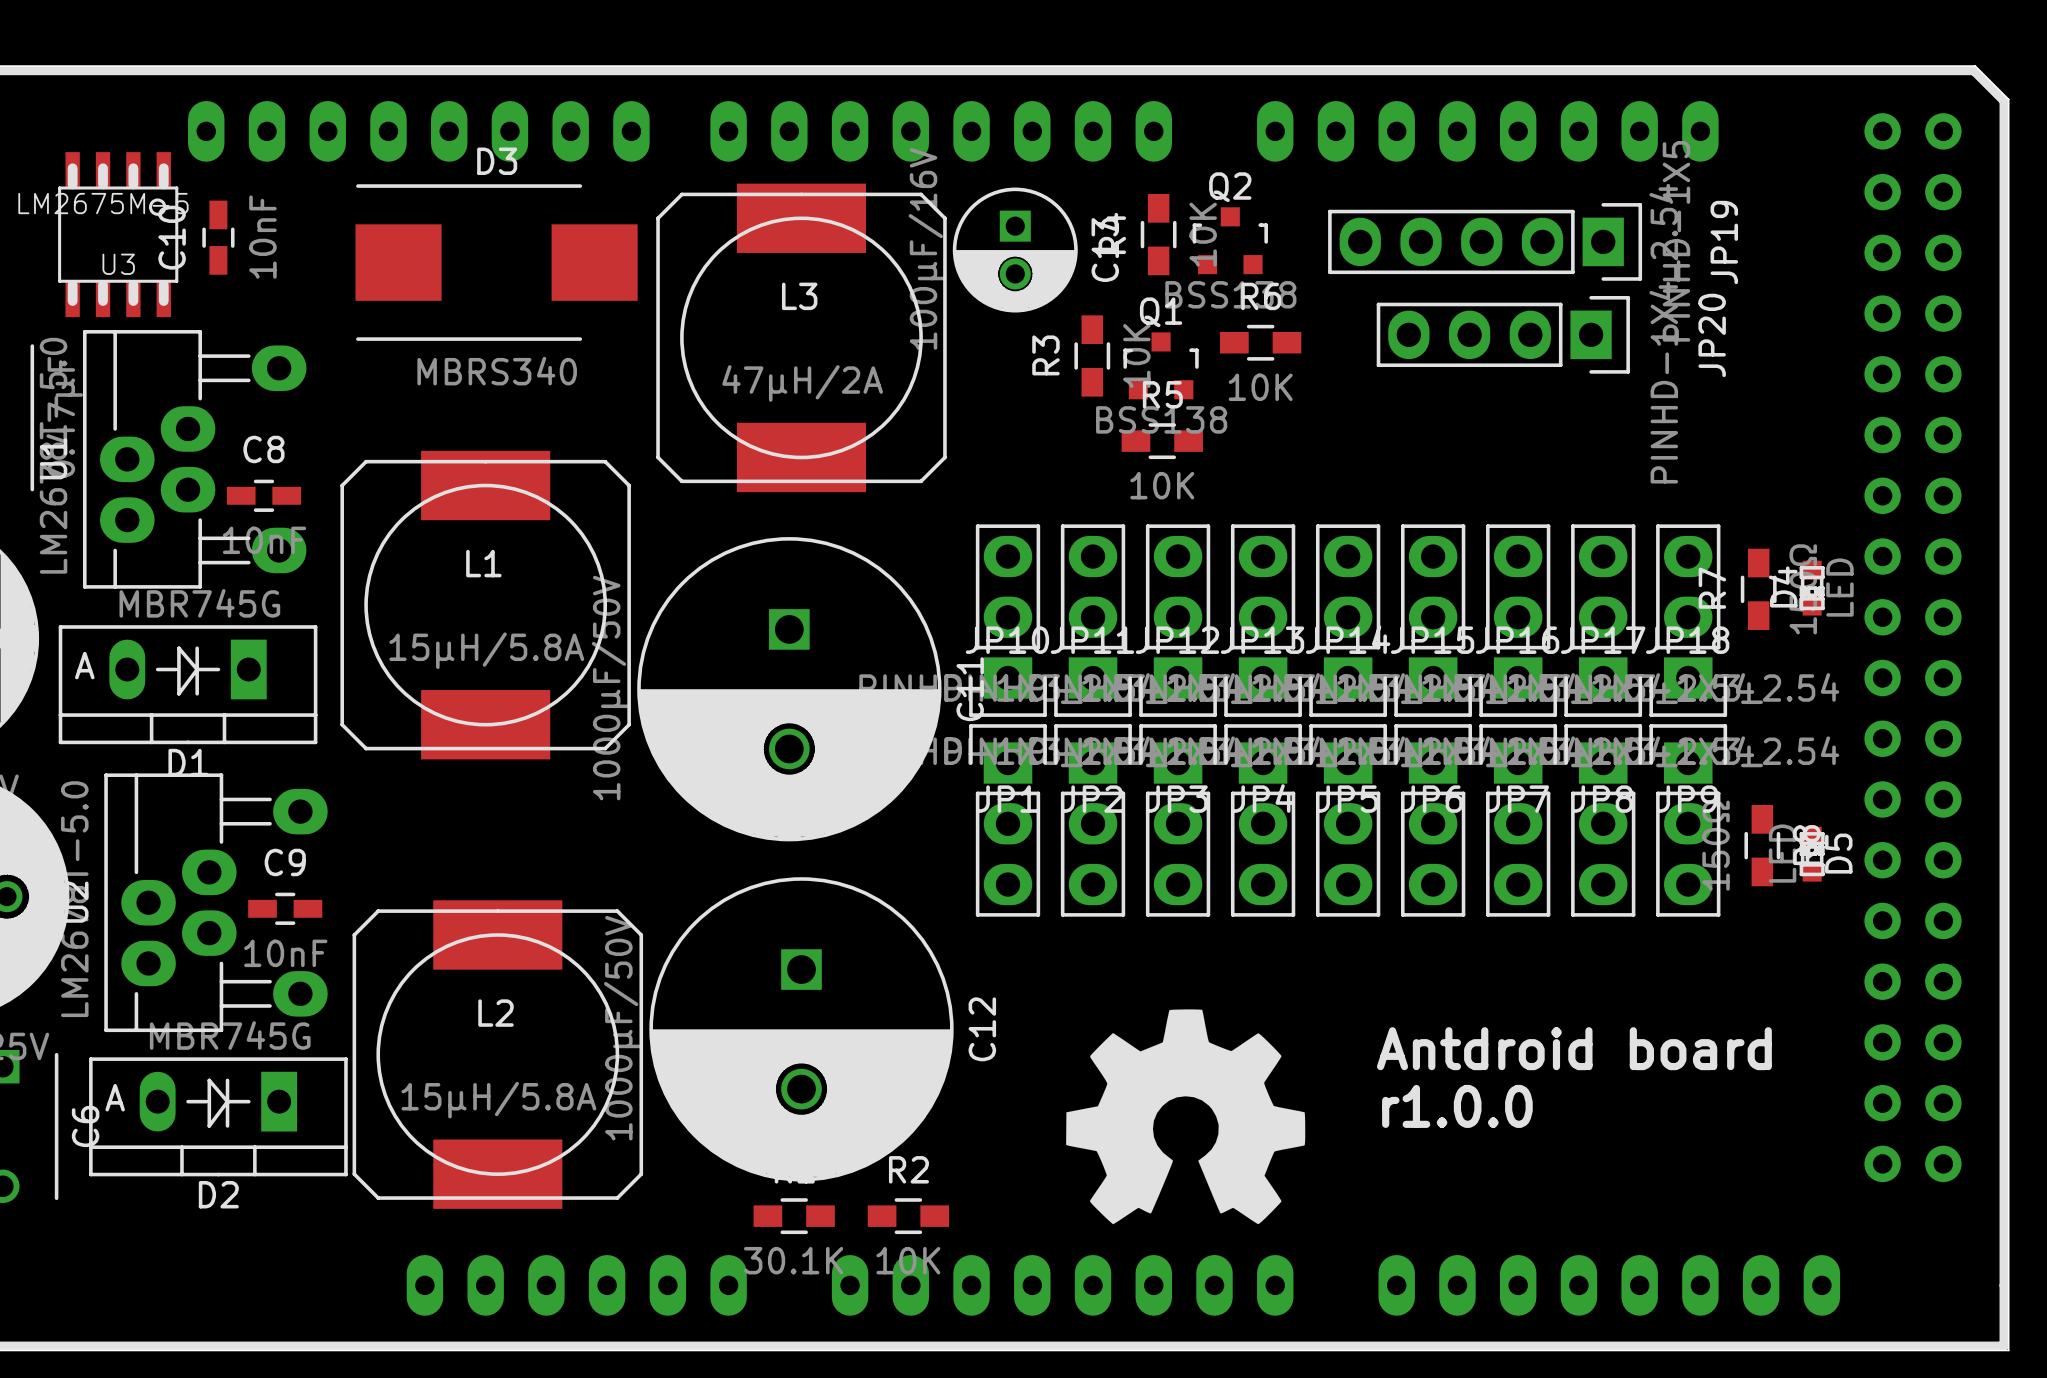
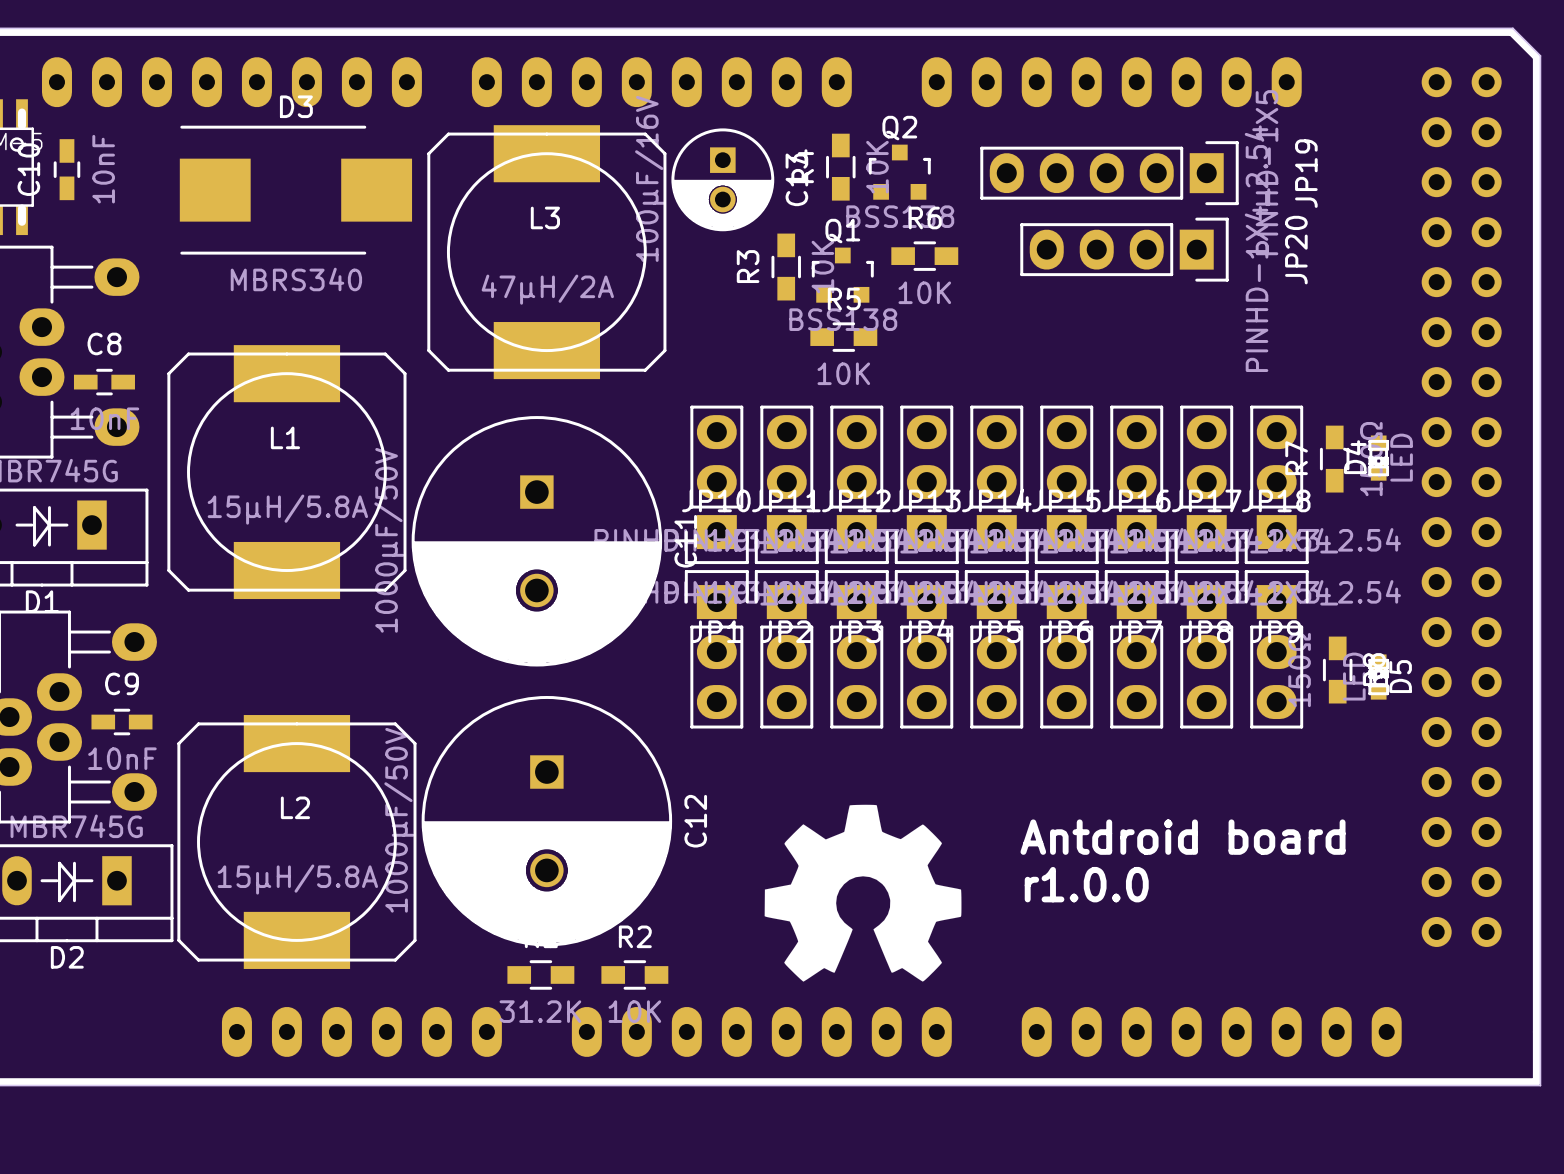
part value: 30.1K (793, 1260) -> 31.2K (540, 1011)

